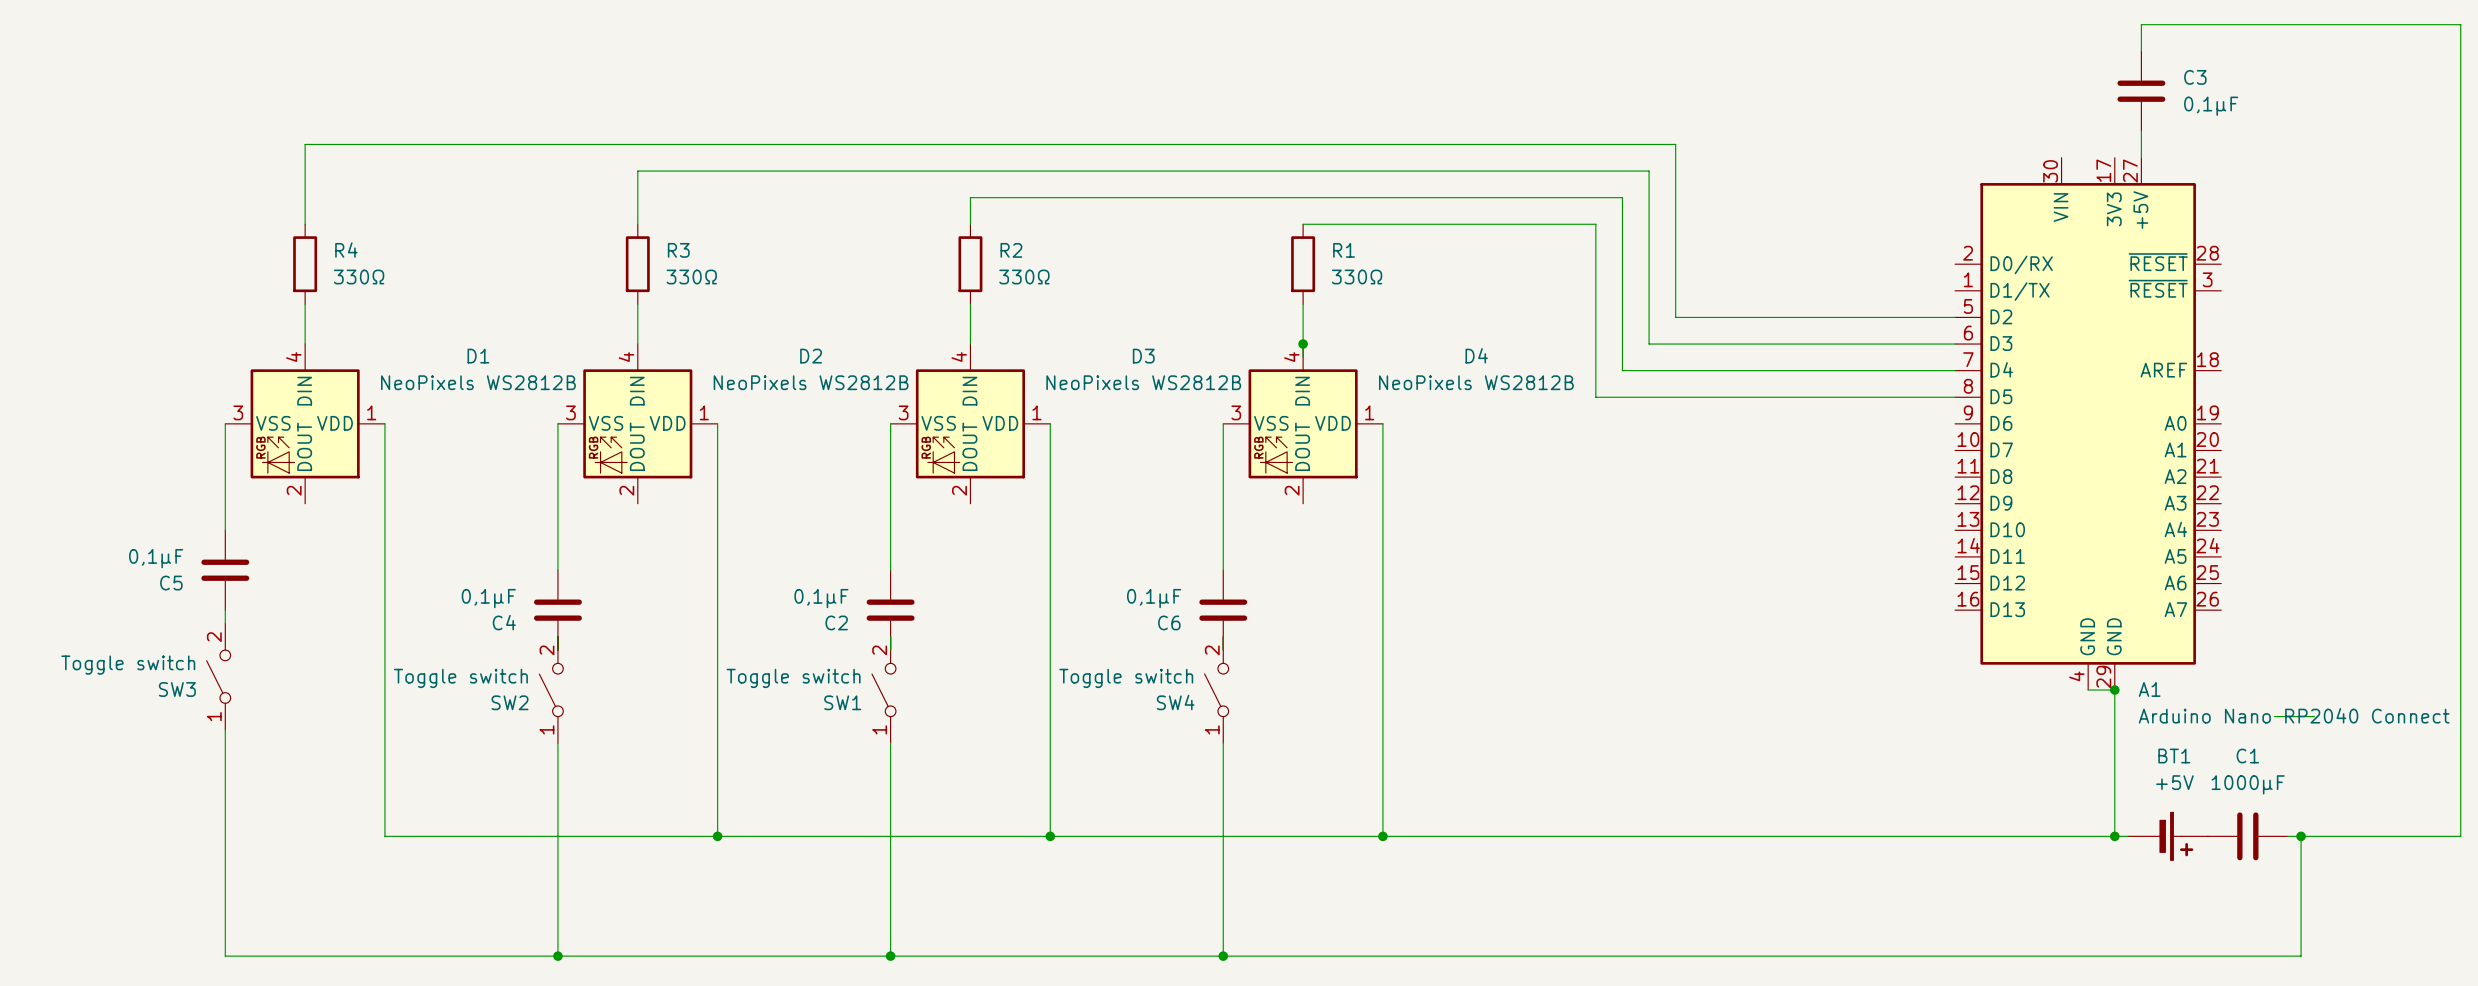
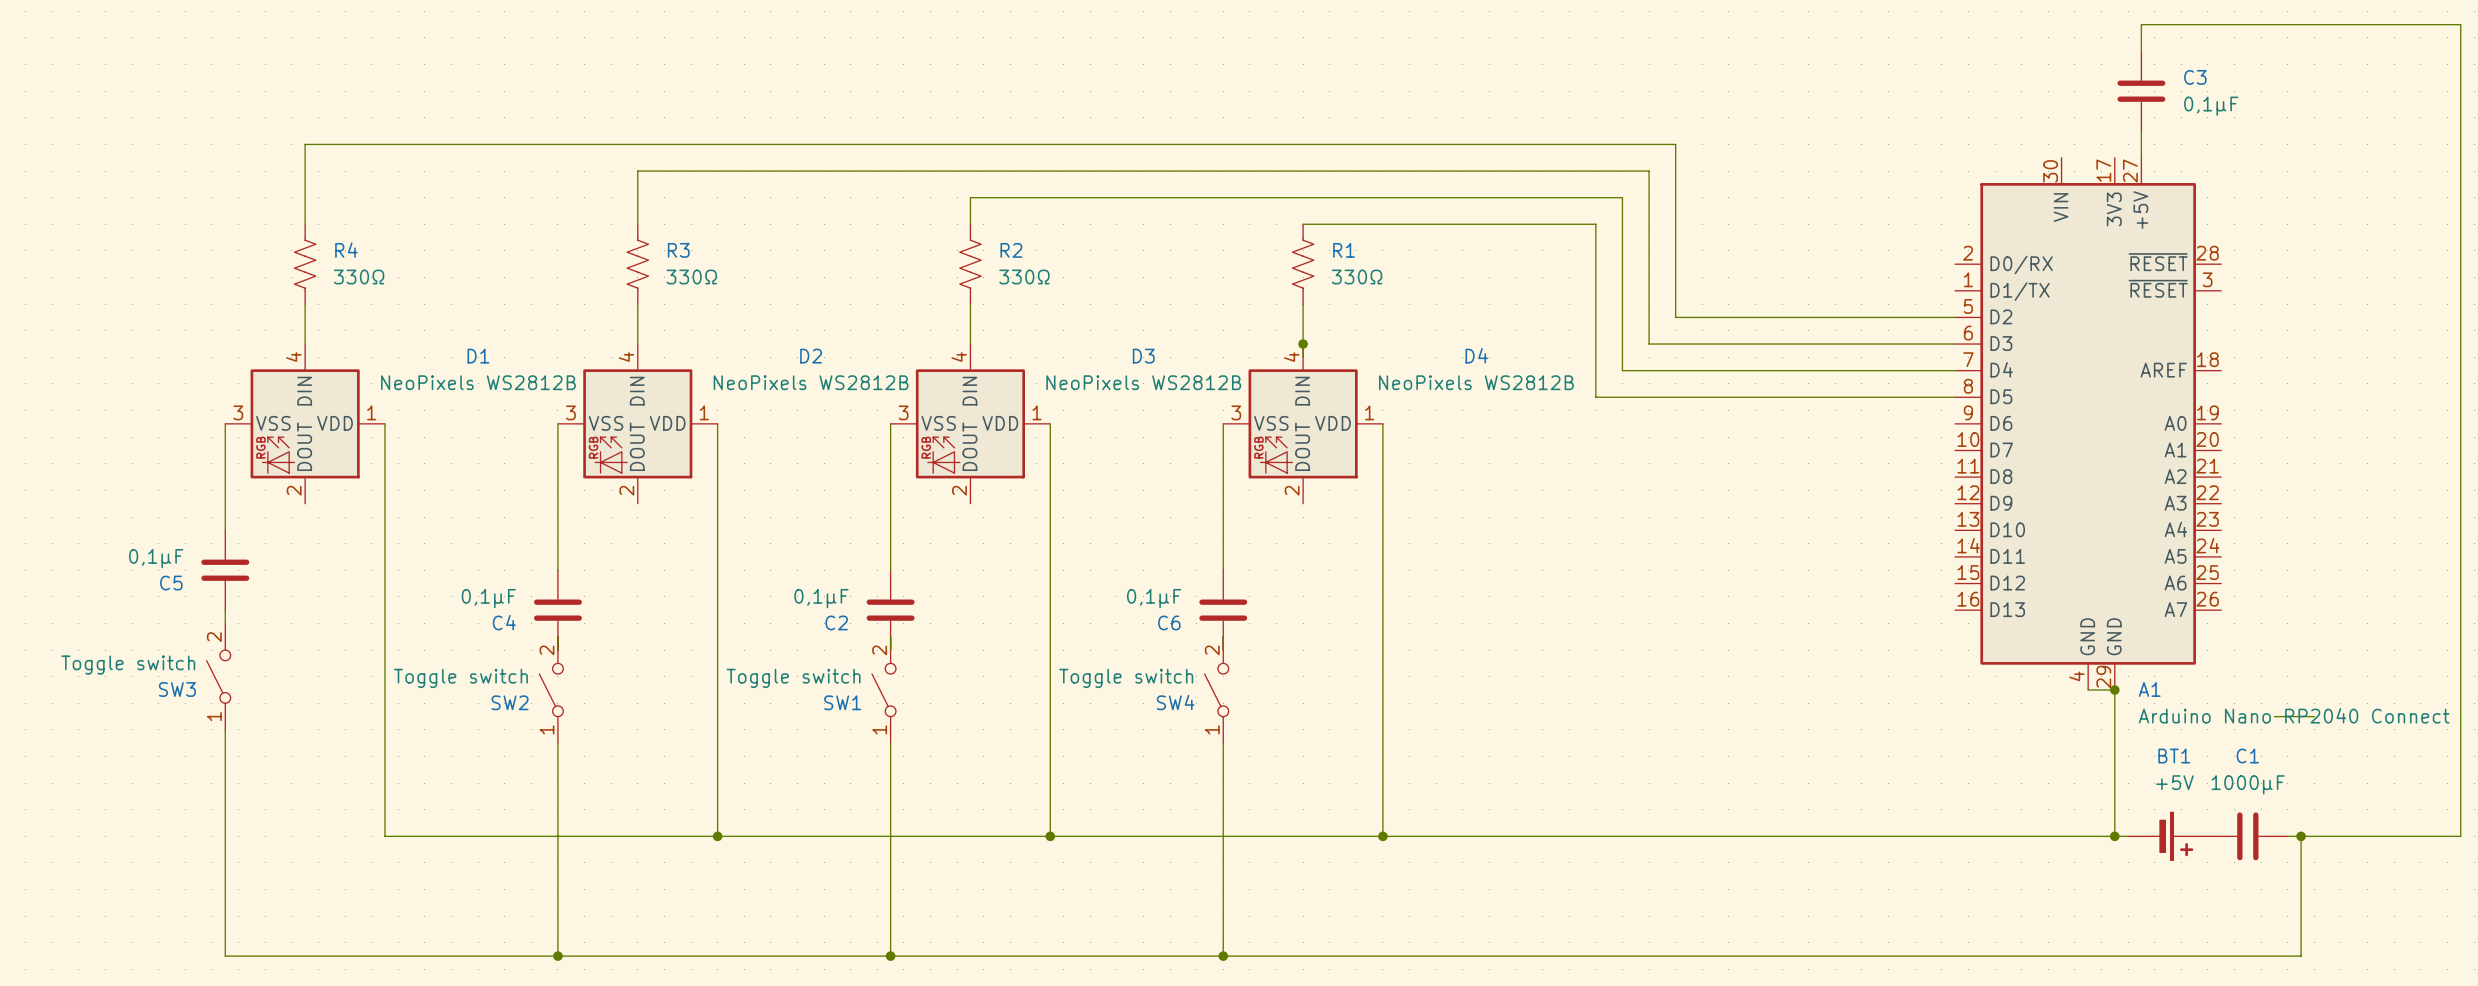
R4 symbol: [293, 224, 318, 305] -> [294, 224, 316, 305]
R3 symbol: [625, 224, 650, 305] -> [627, 224, 649, 305]
R2 symbol: [958, 224, 983, 305] -> [959, 224, 982, 305]
R1 symbol: [1291, 224, 1316, 305] -> [1292, 224, 1314, 305]

